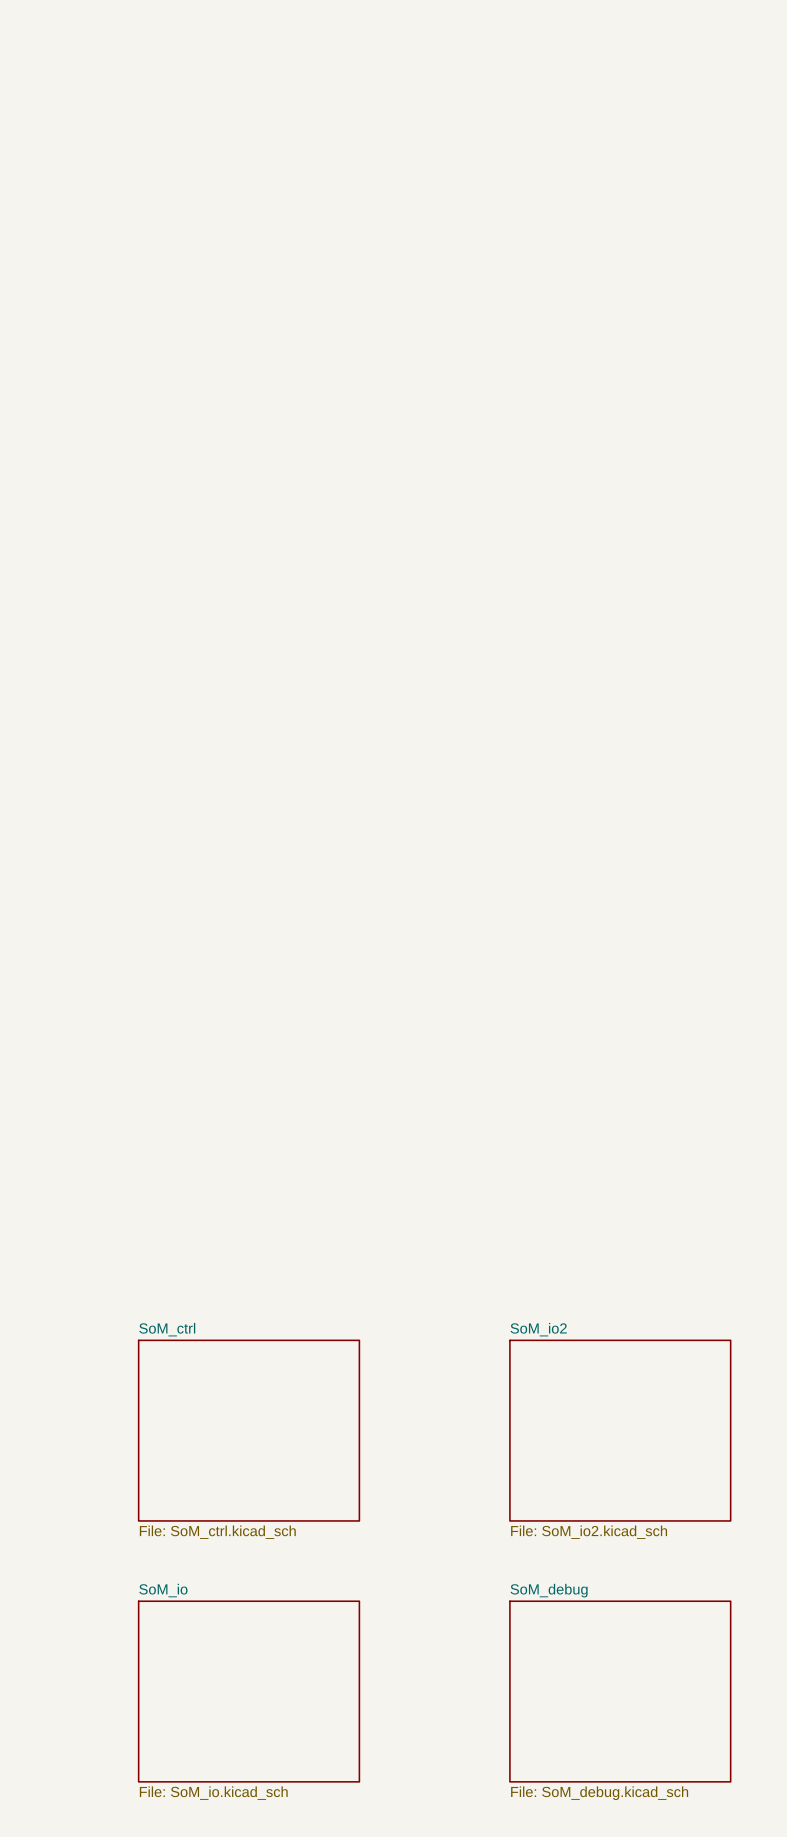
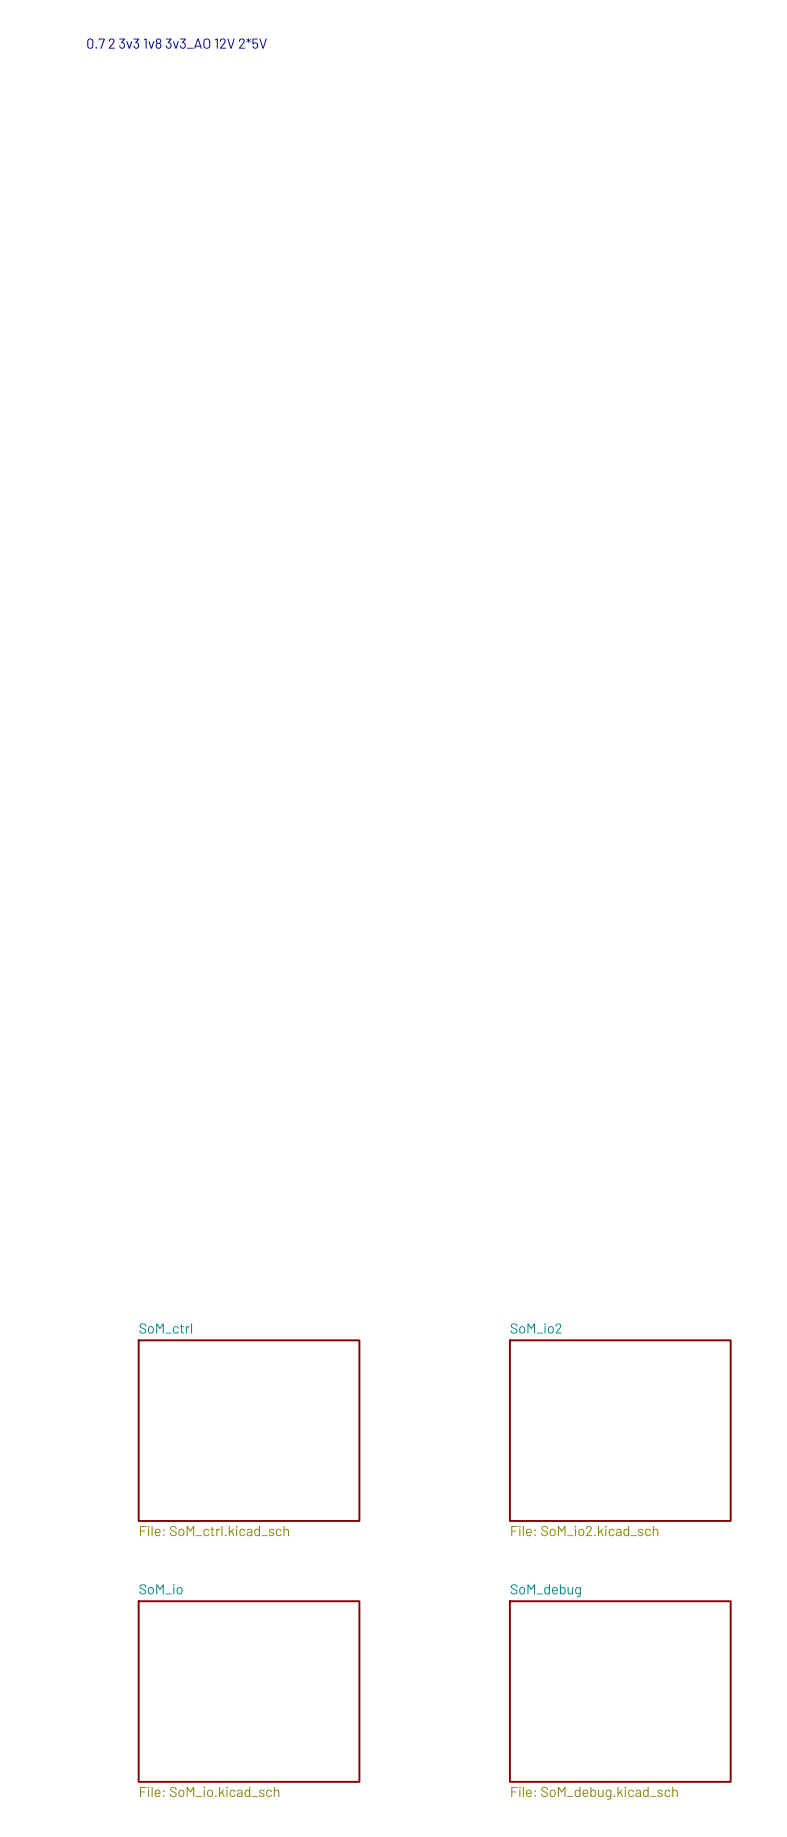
text: none -> 0.7 2 3v3 1v8 3v3_AO 12V 2*5V (177, 43)

